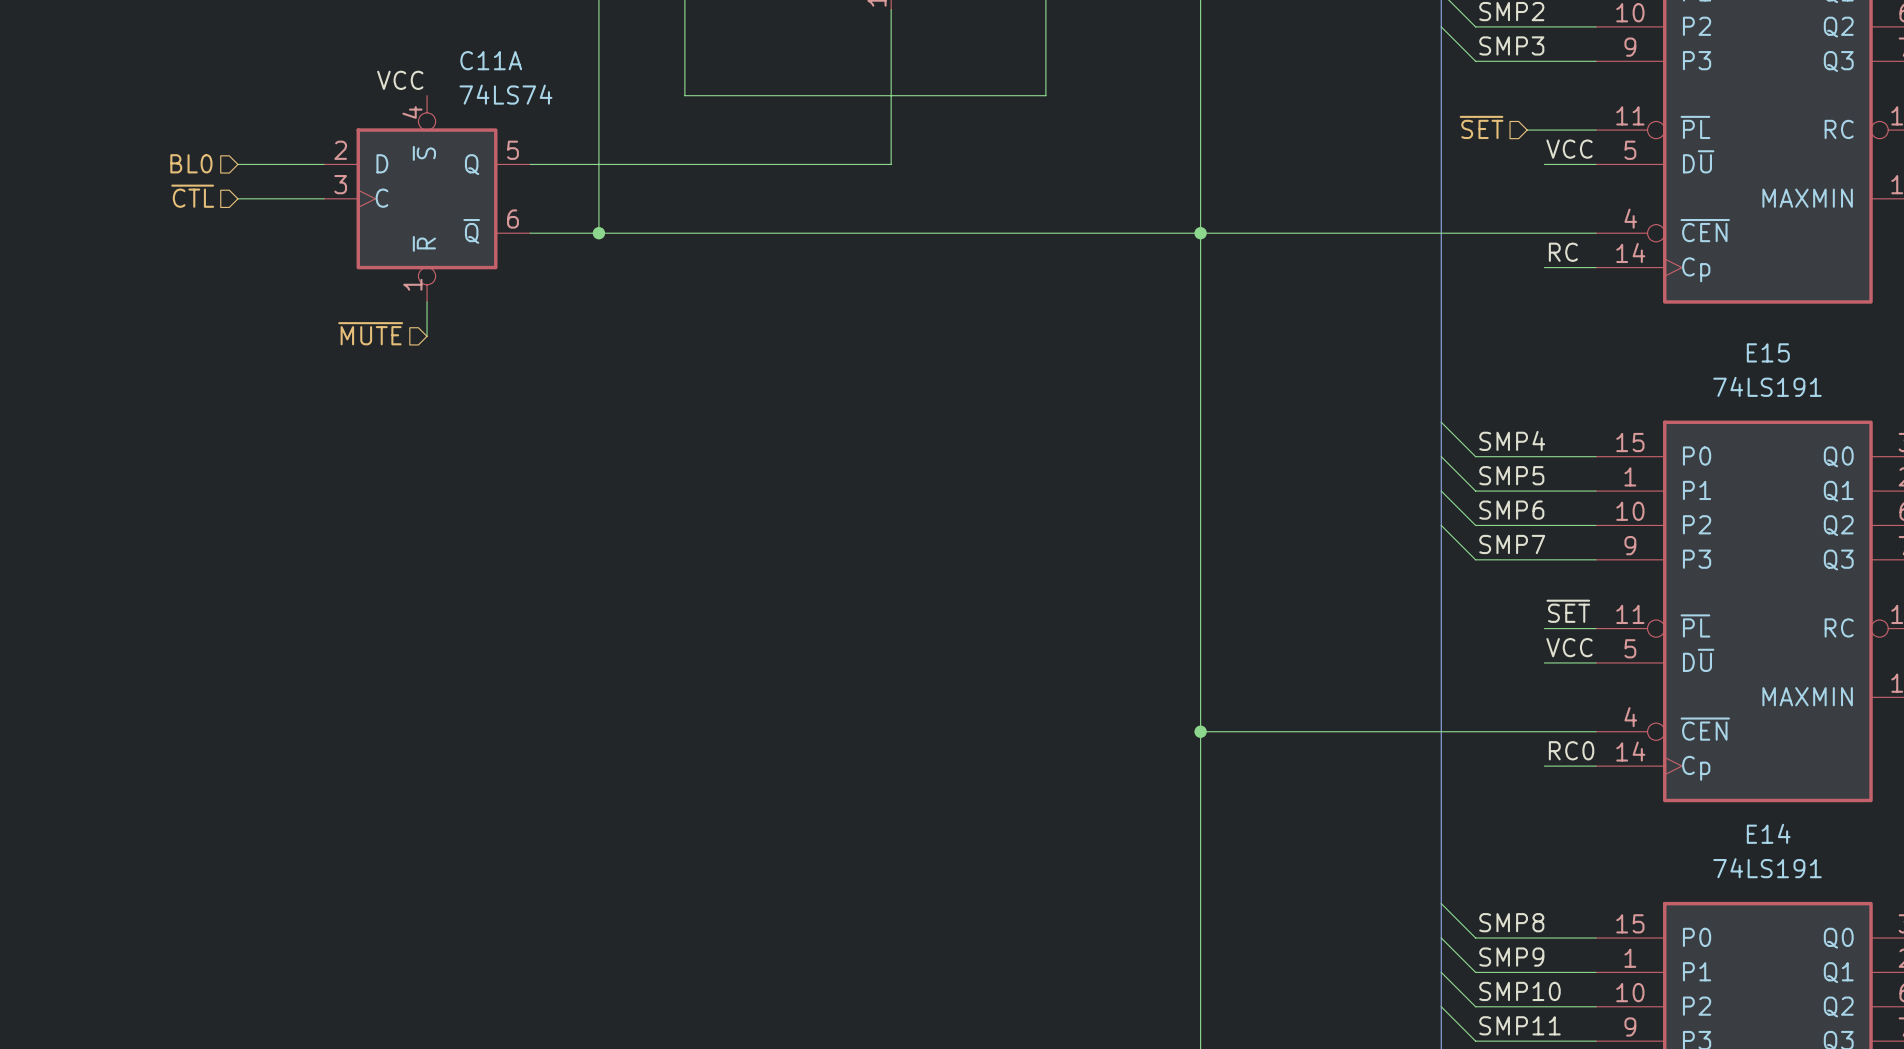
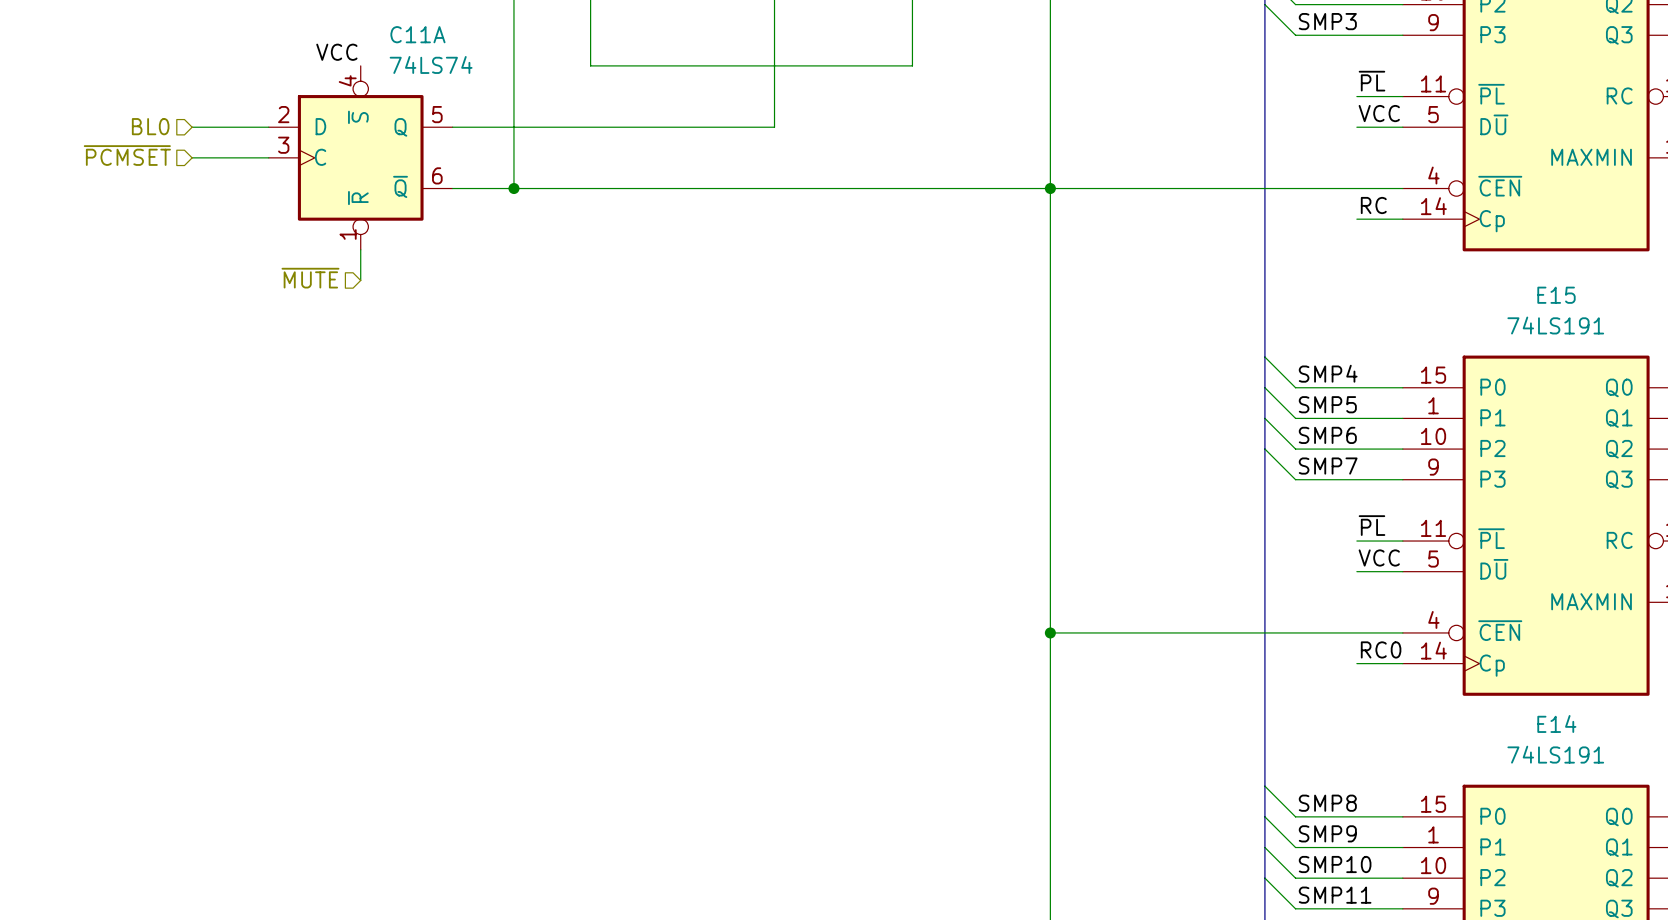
label: none -> ~{PL} (1372, 81)
hierarchical label: ~{SET} (1481, 127) -> none
wire: (1527, 130) (1544, 130) -> none
hierarchical label: ~{CTL} (192, 196) -> ~{PCMSET} (127, 155)
label: ~{SET} (1568, 611) -> ~{PL} (1372, 525)

